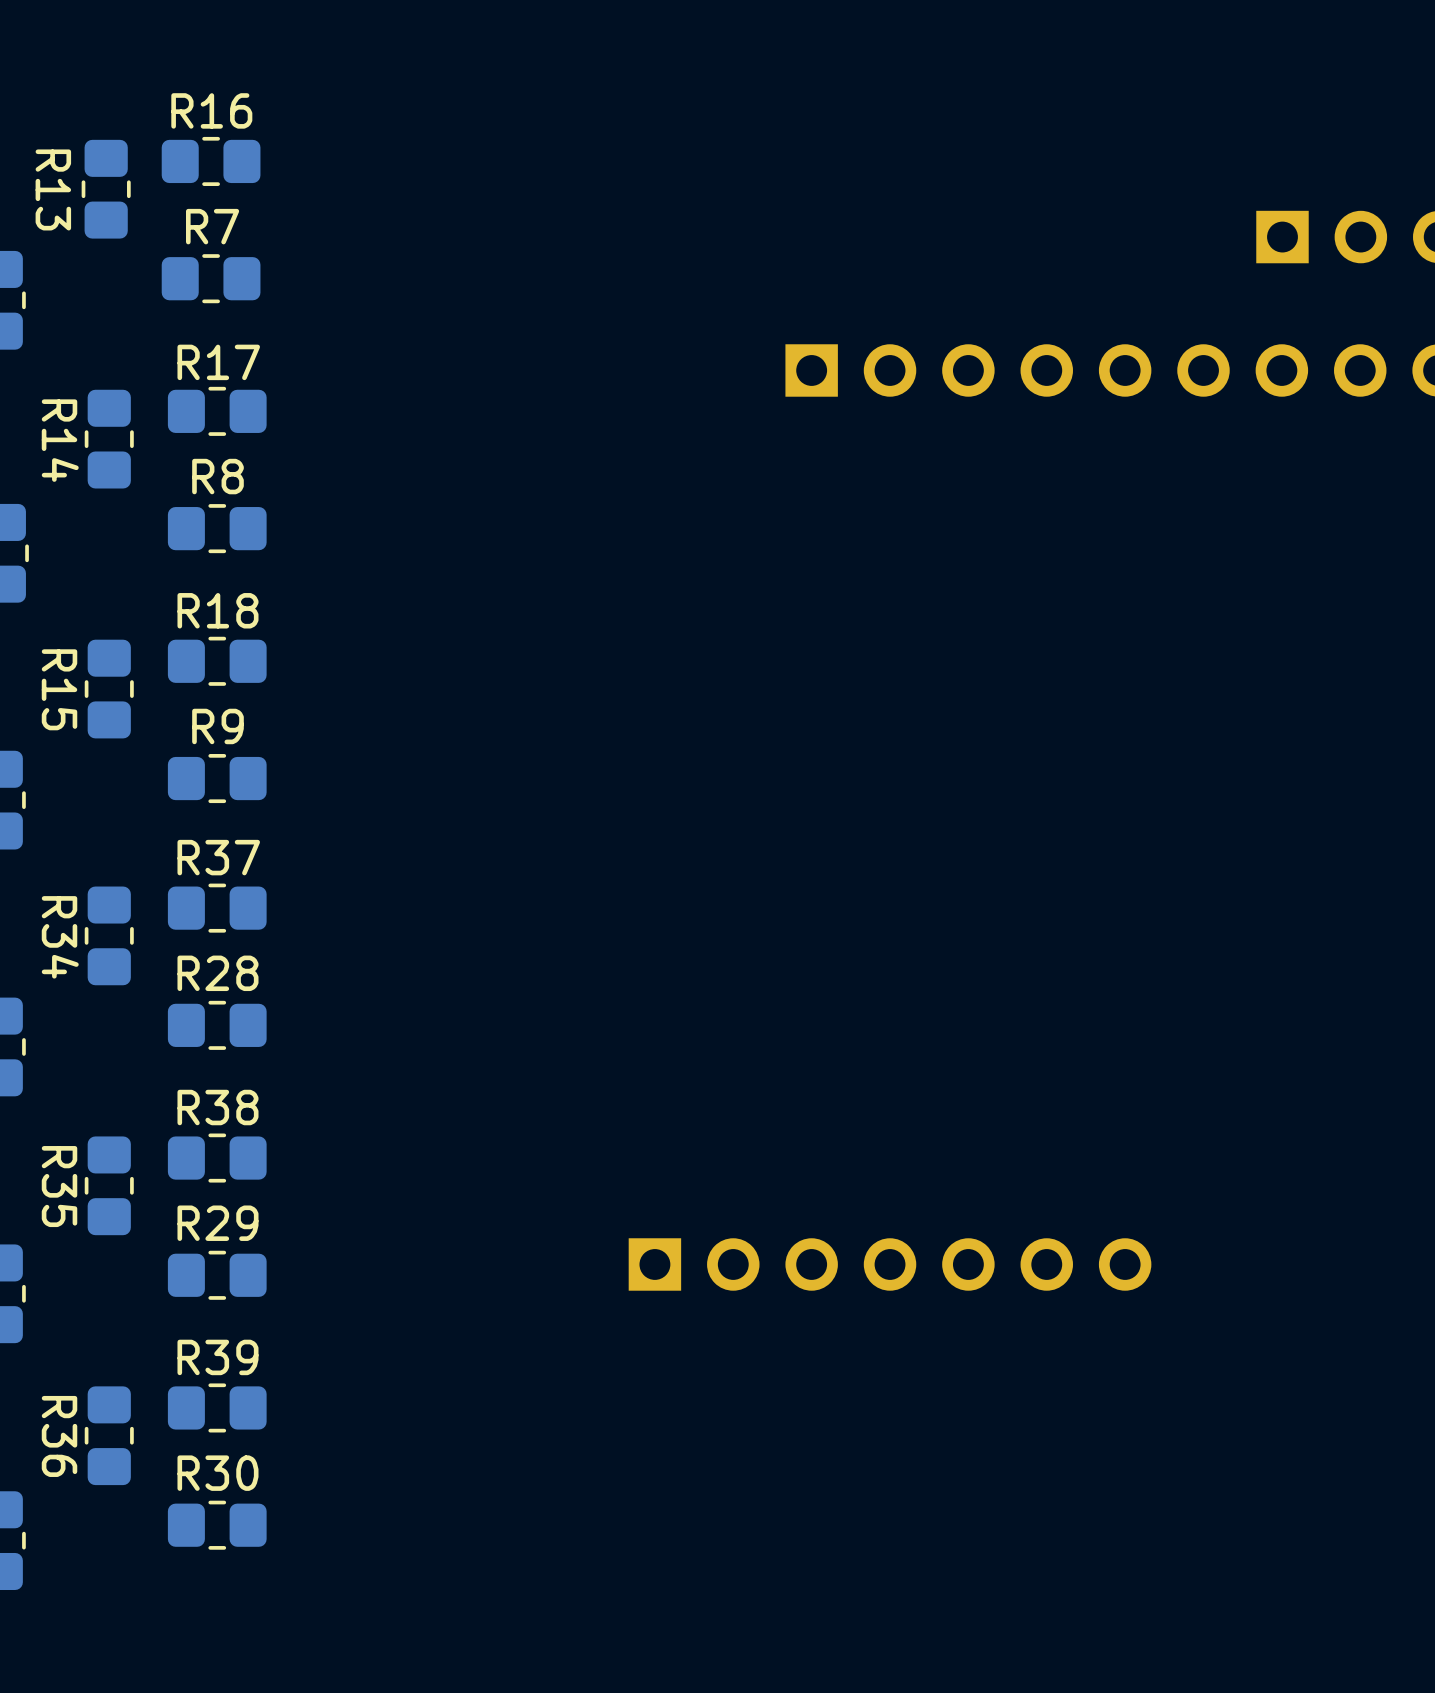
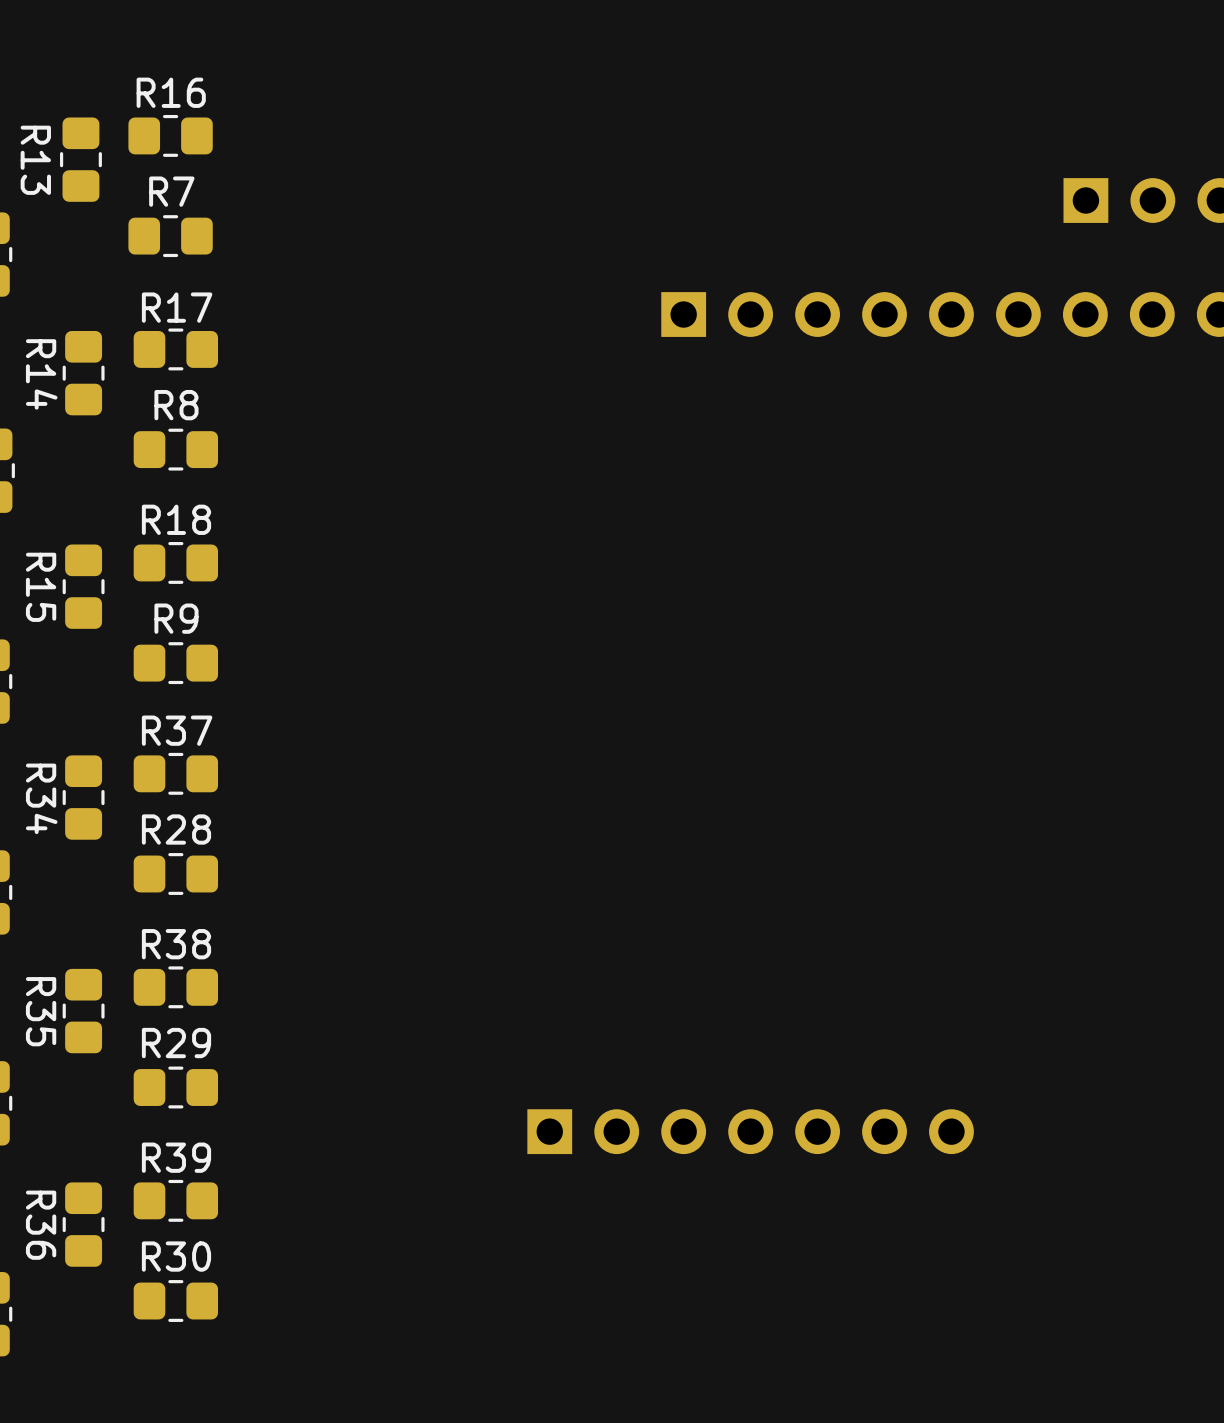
part position: (890, 1264) -> (750, 1131)

